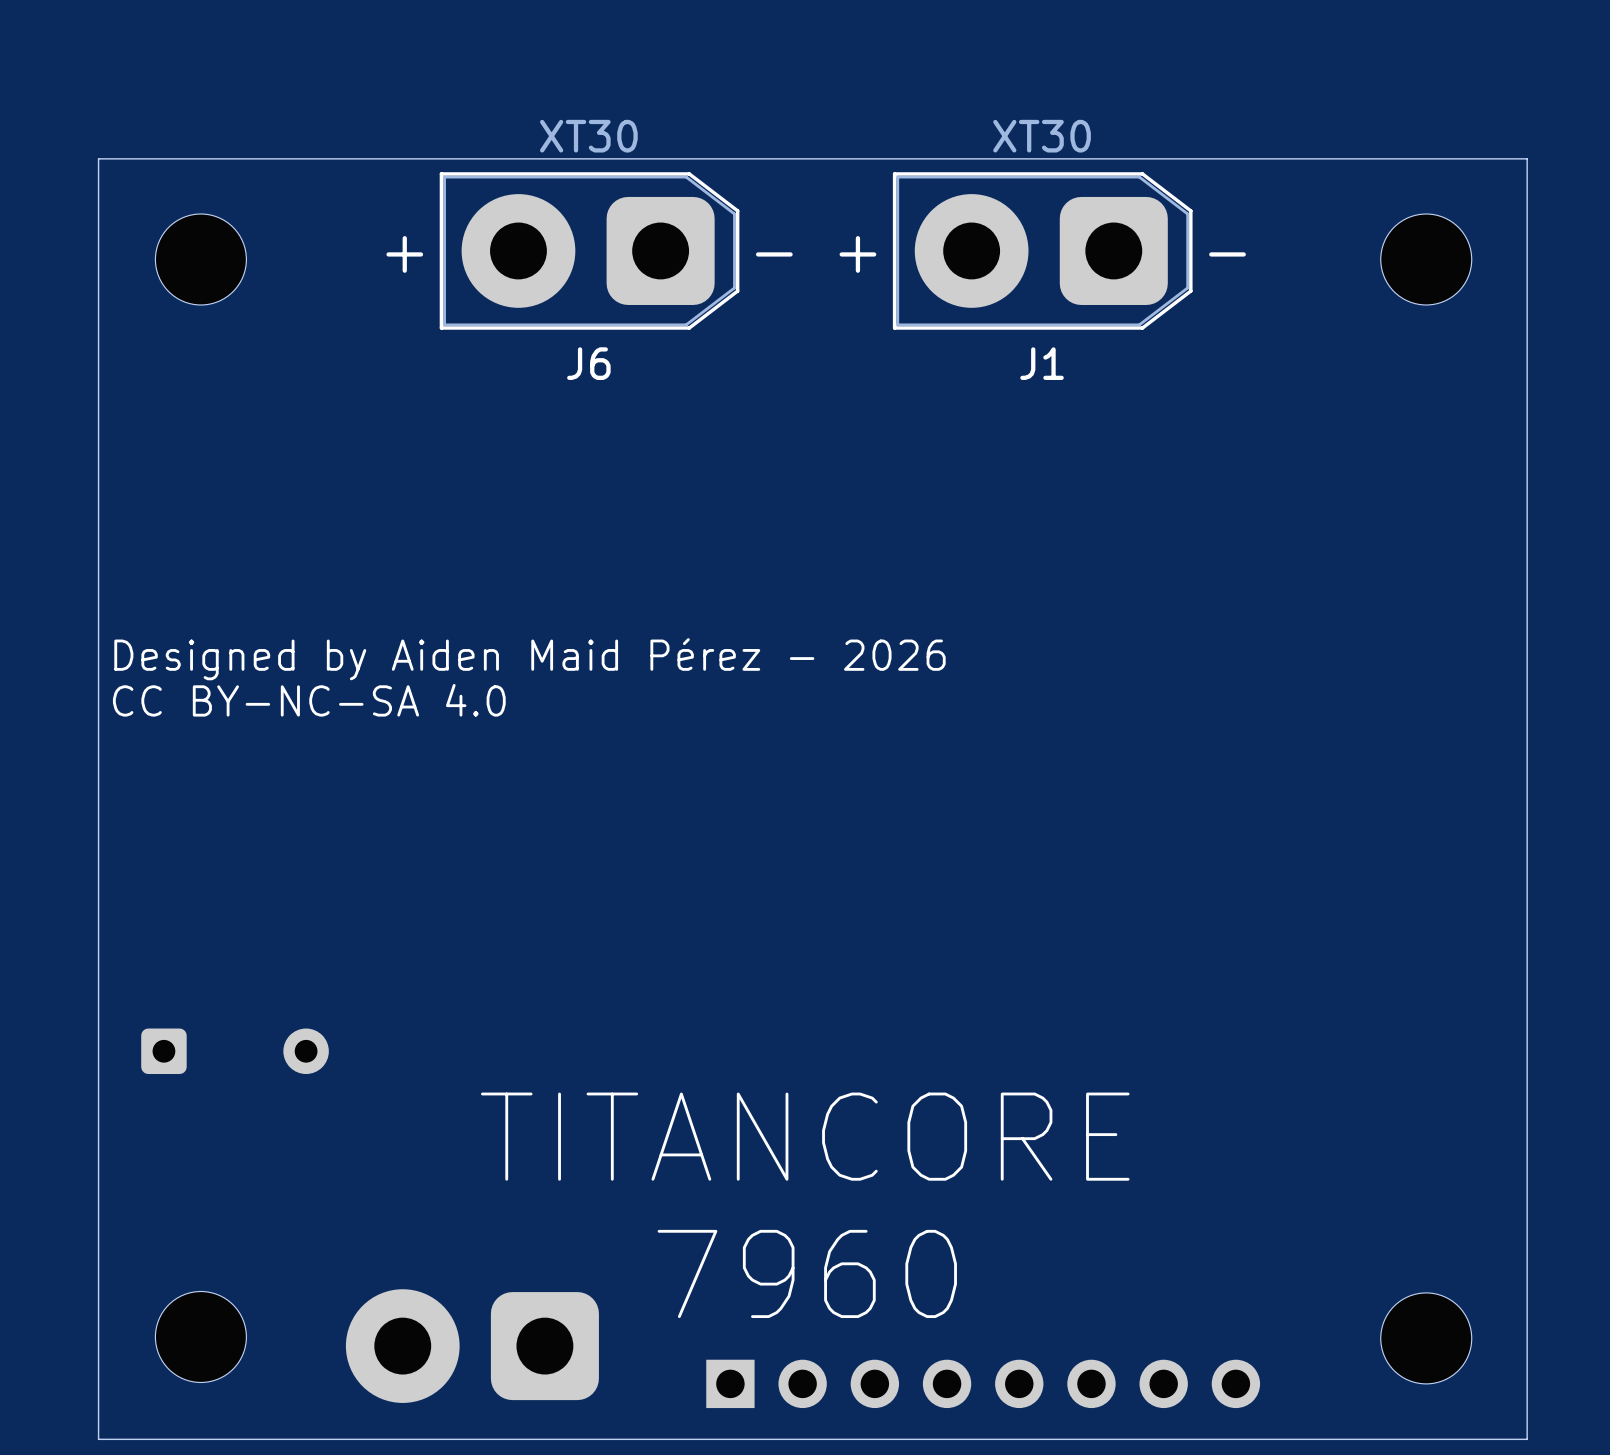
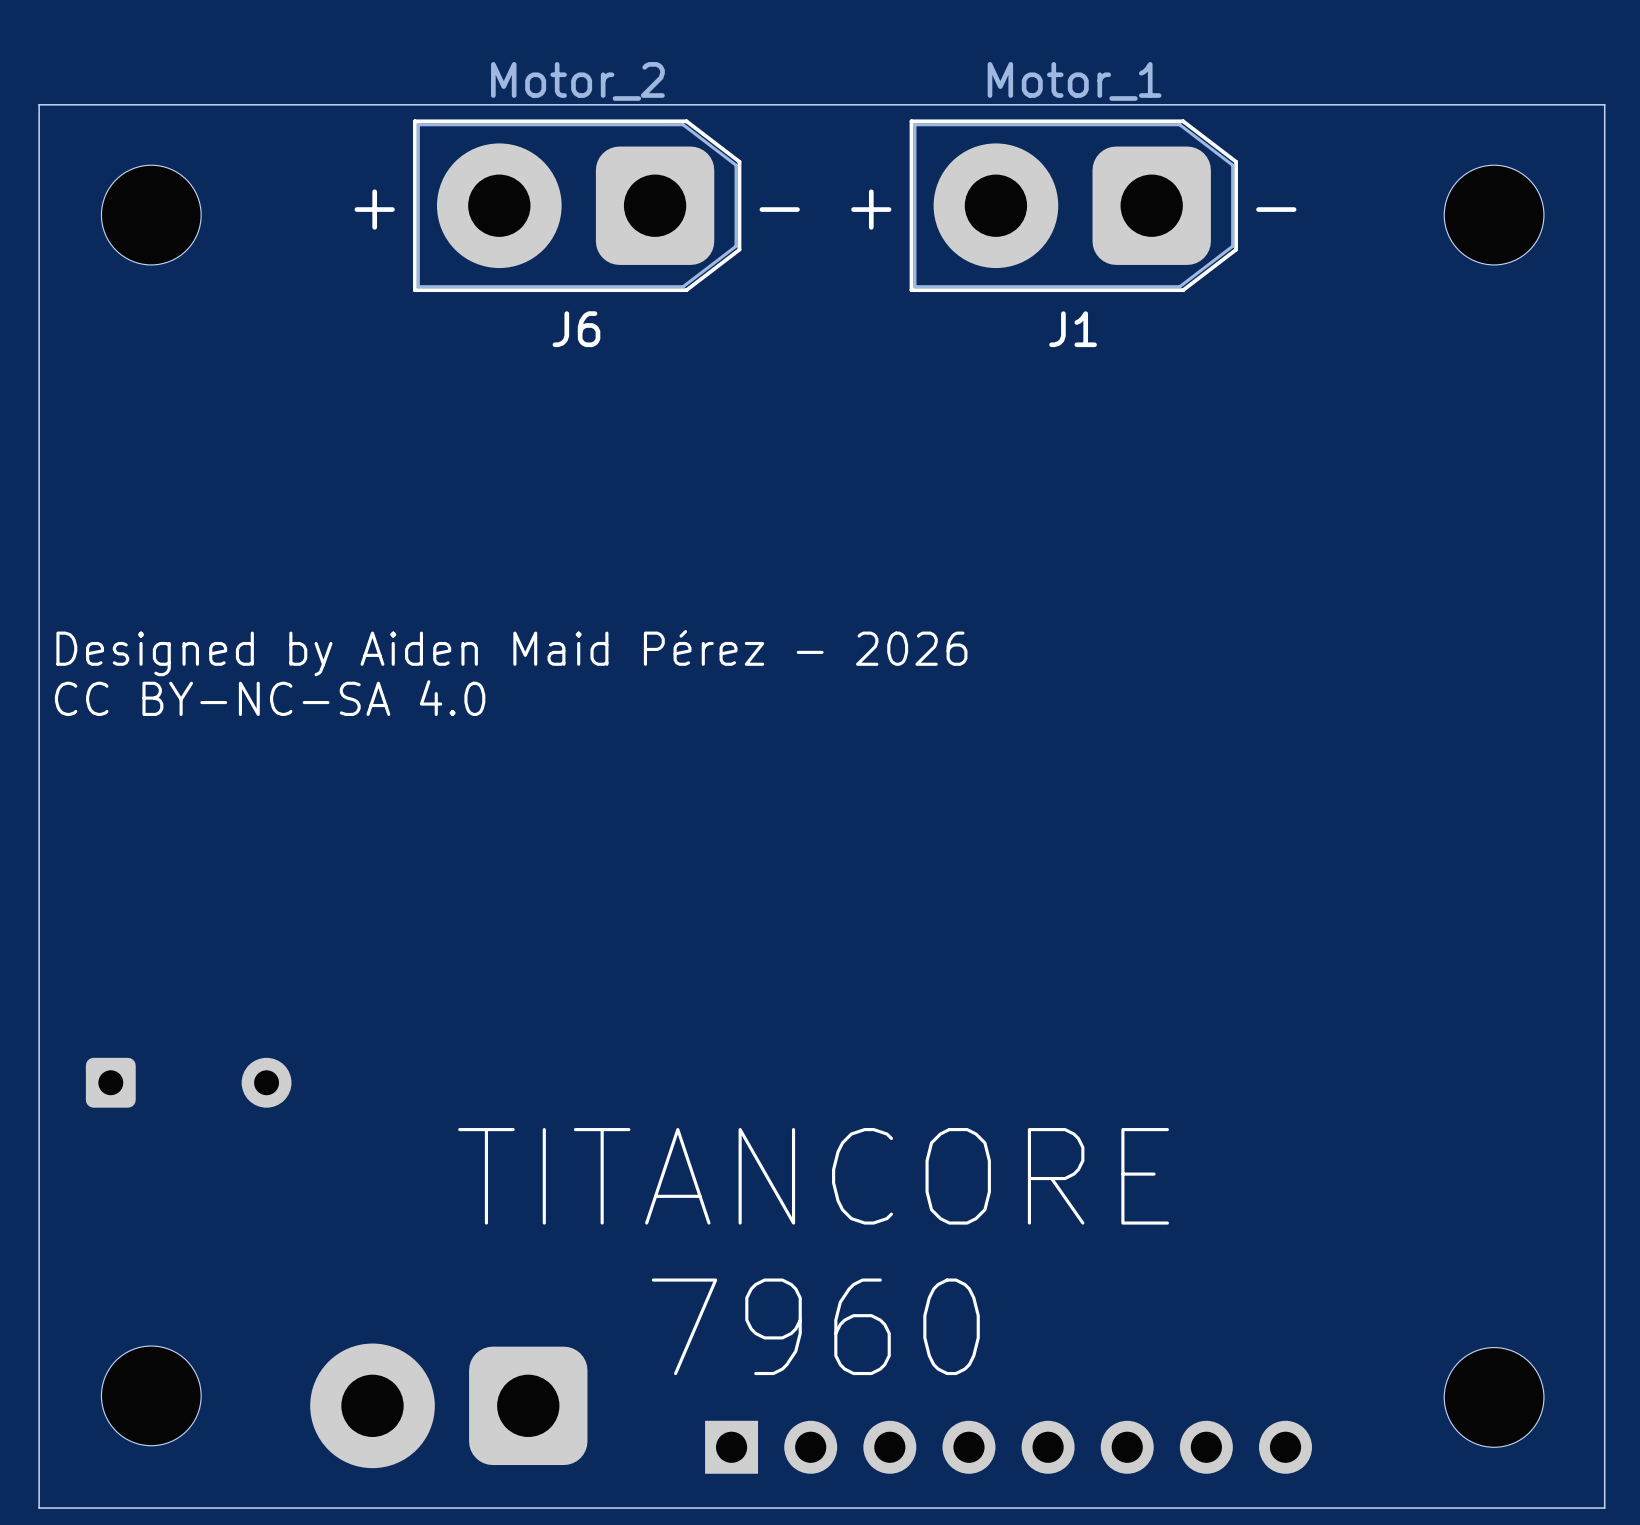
J6 value: XT30 (588, 136) -> Motor_2 (577, 81)
J1 value: XT30 (1042, 136) -> Motor_1 (1074, 81)

